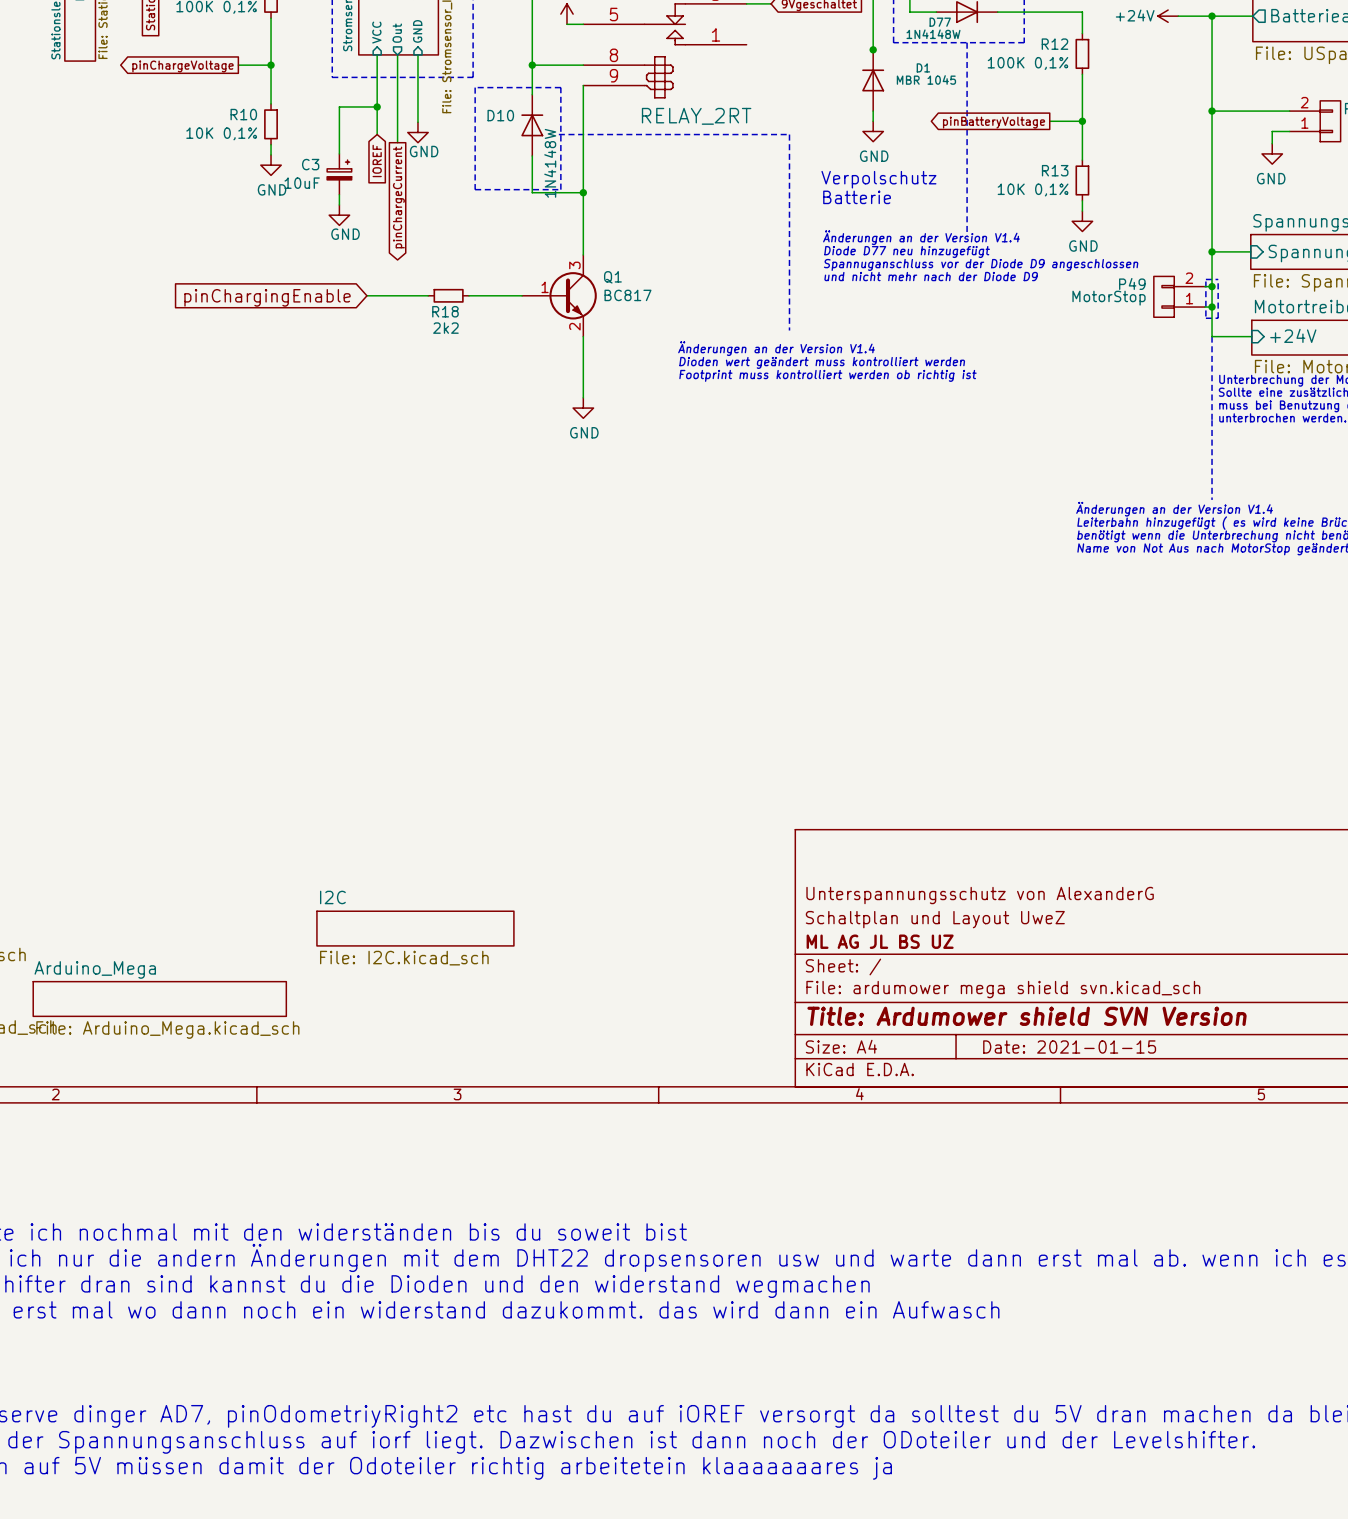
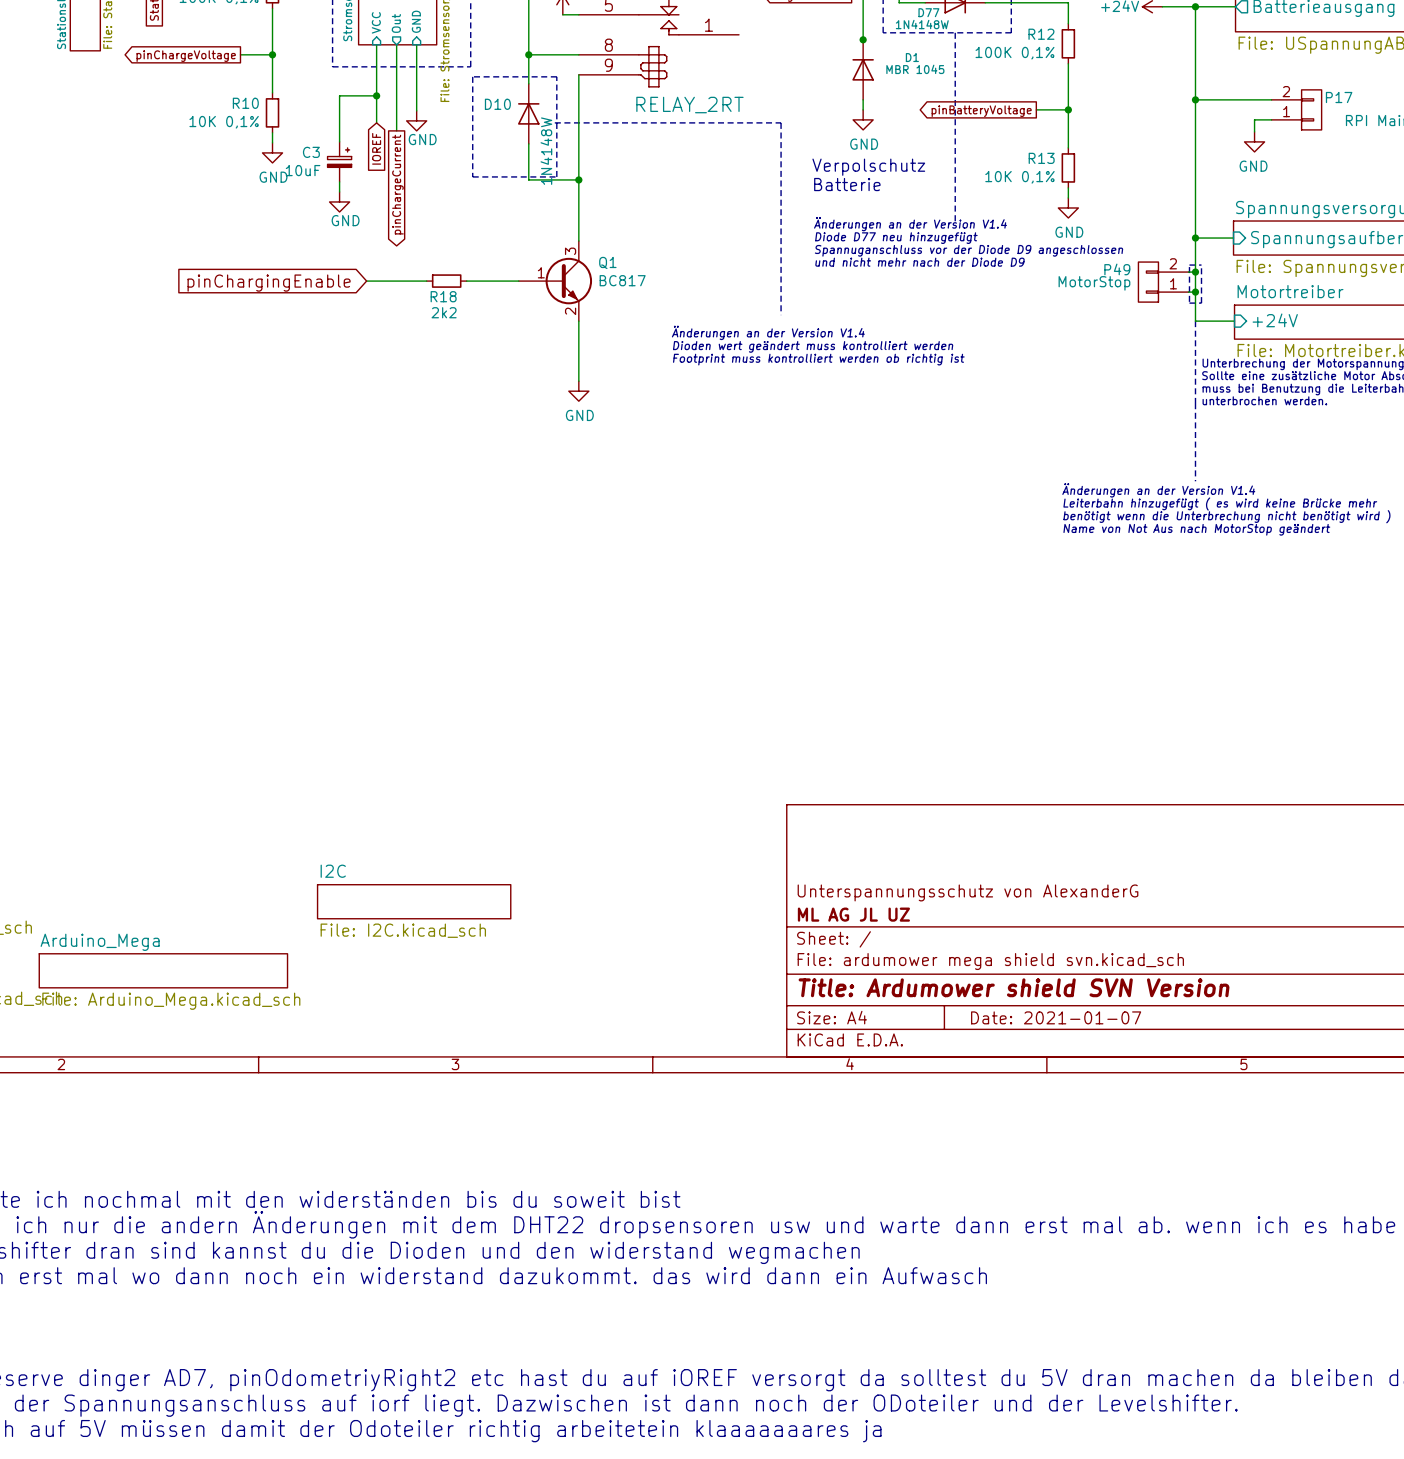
title block: Unterspannungsschutz von AlexanderG (980, 895) -> none
title block: Schaltplan und Layout UweZ (935, 919) -> Unterspannungsschutz von AlexanderG (968, 892)
title block: ML AG JL BS UZ (880, 941) -> ML AG JL UZ (853, 914)
title block: Date: 2021-01-15 (1069, 1047) -> Date: 2021-01-07 (1056, 1017)

